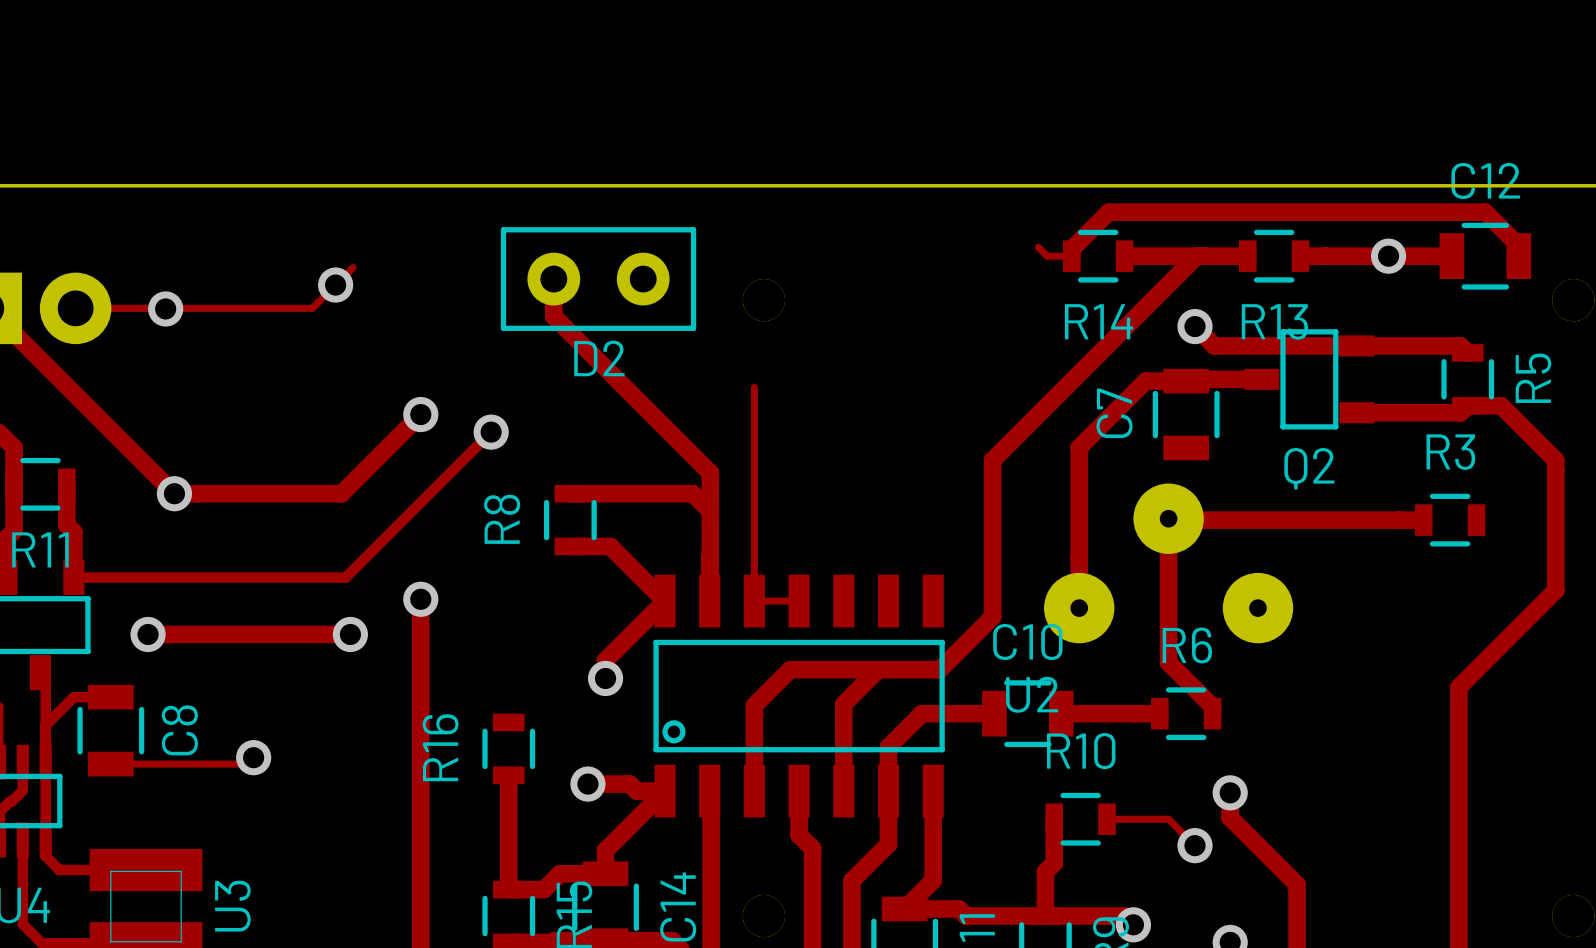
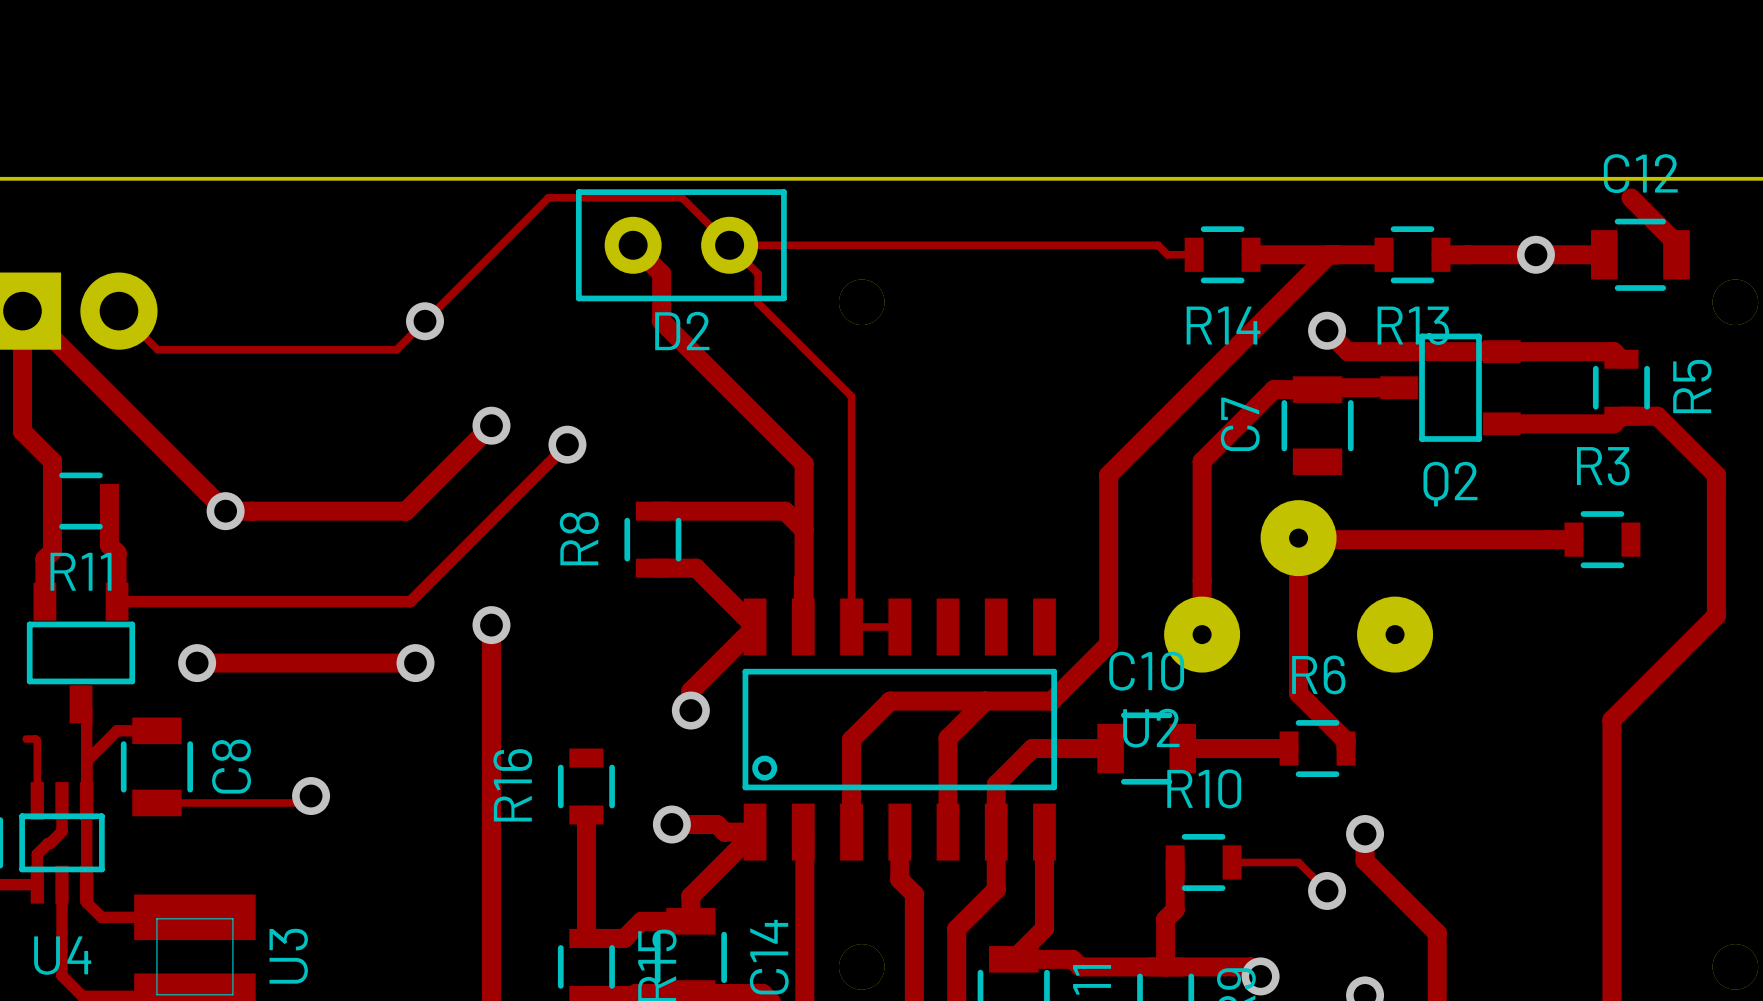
track: (1485, 212) (1108, 212) (1071, 249) (1071, 256) -> (1640, 207) (1630, 197)
track: none -> (729, 245) (1158, 245)
track: (353, 267) (312, 308) (75, 308) -> (851, 396) (758, 303) (758, 273) (682, 197) (548, 197) (396, 349) (157, 349) (118, 311)
track: (553, 279) (553, 316) (710, 472) -> (633, 245) (661, 273) (661, 321) (804, 463) (804, 488)
D2 position: (598, 279) -> (681, 245)
via position: (335, 285) -> (425, 321)
via: (165, 308) -> none

